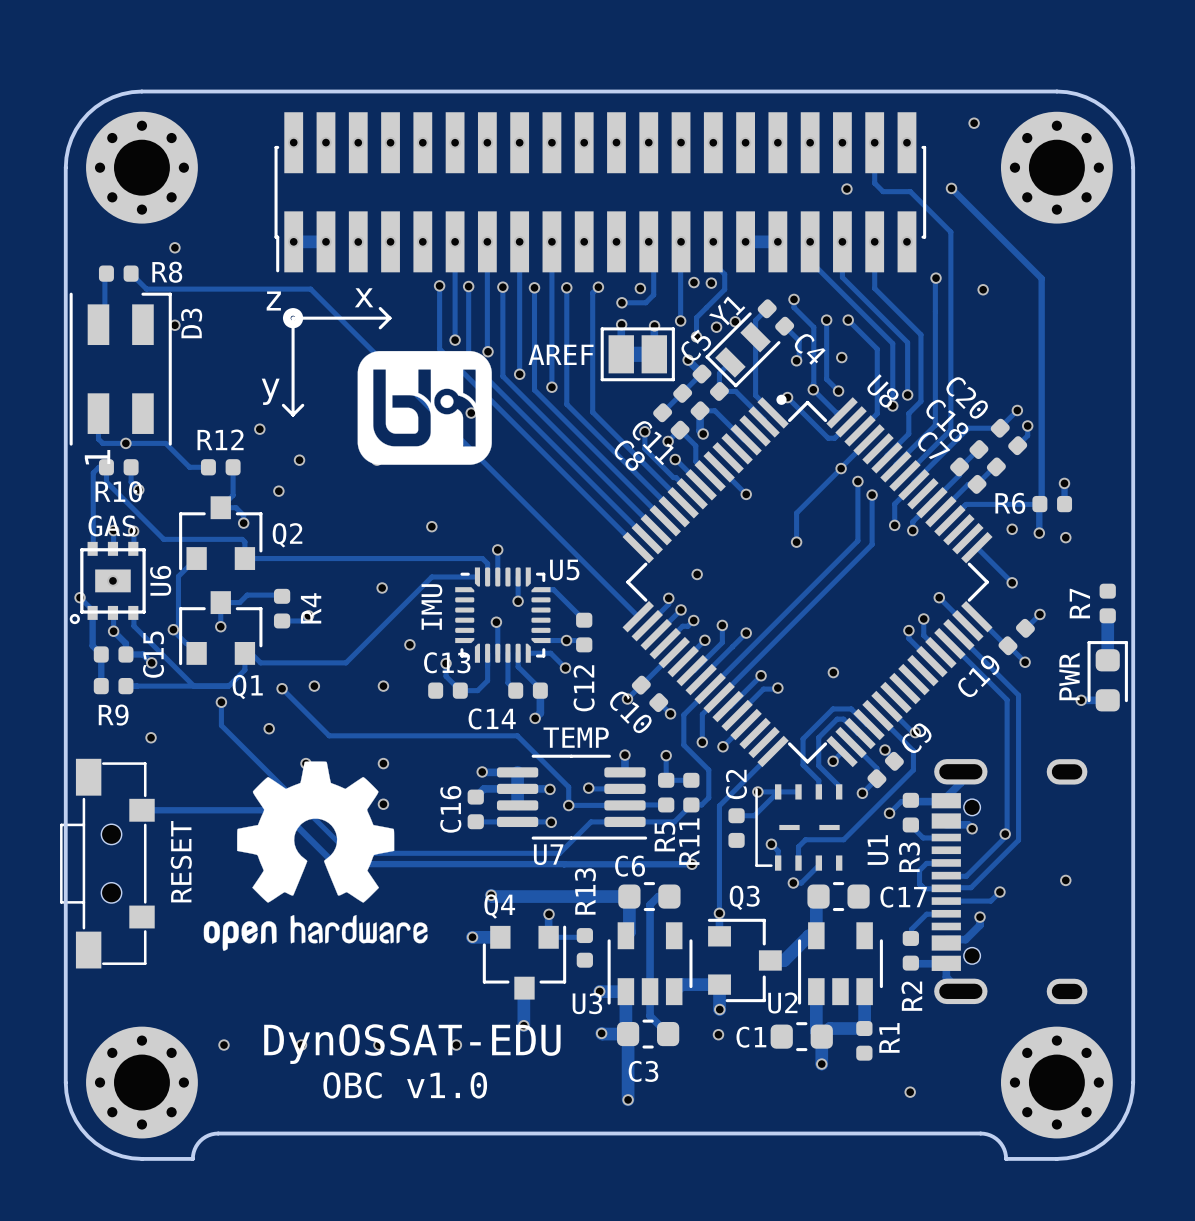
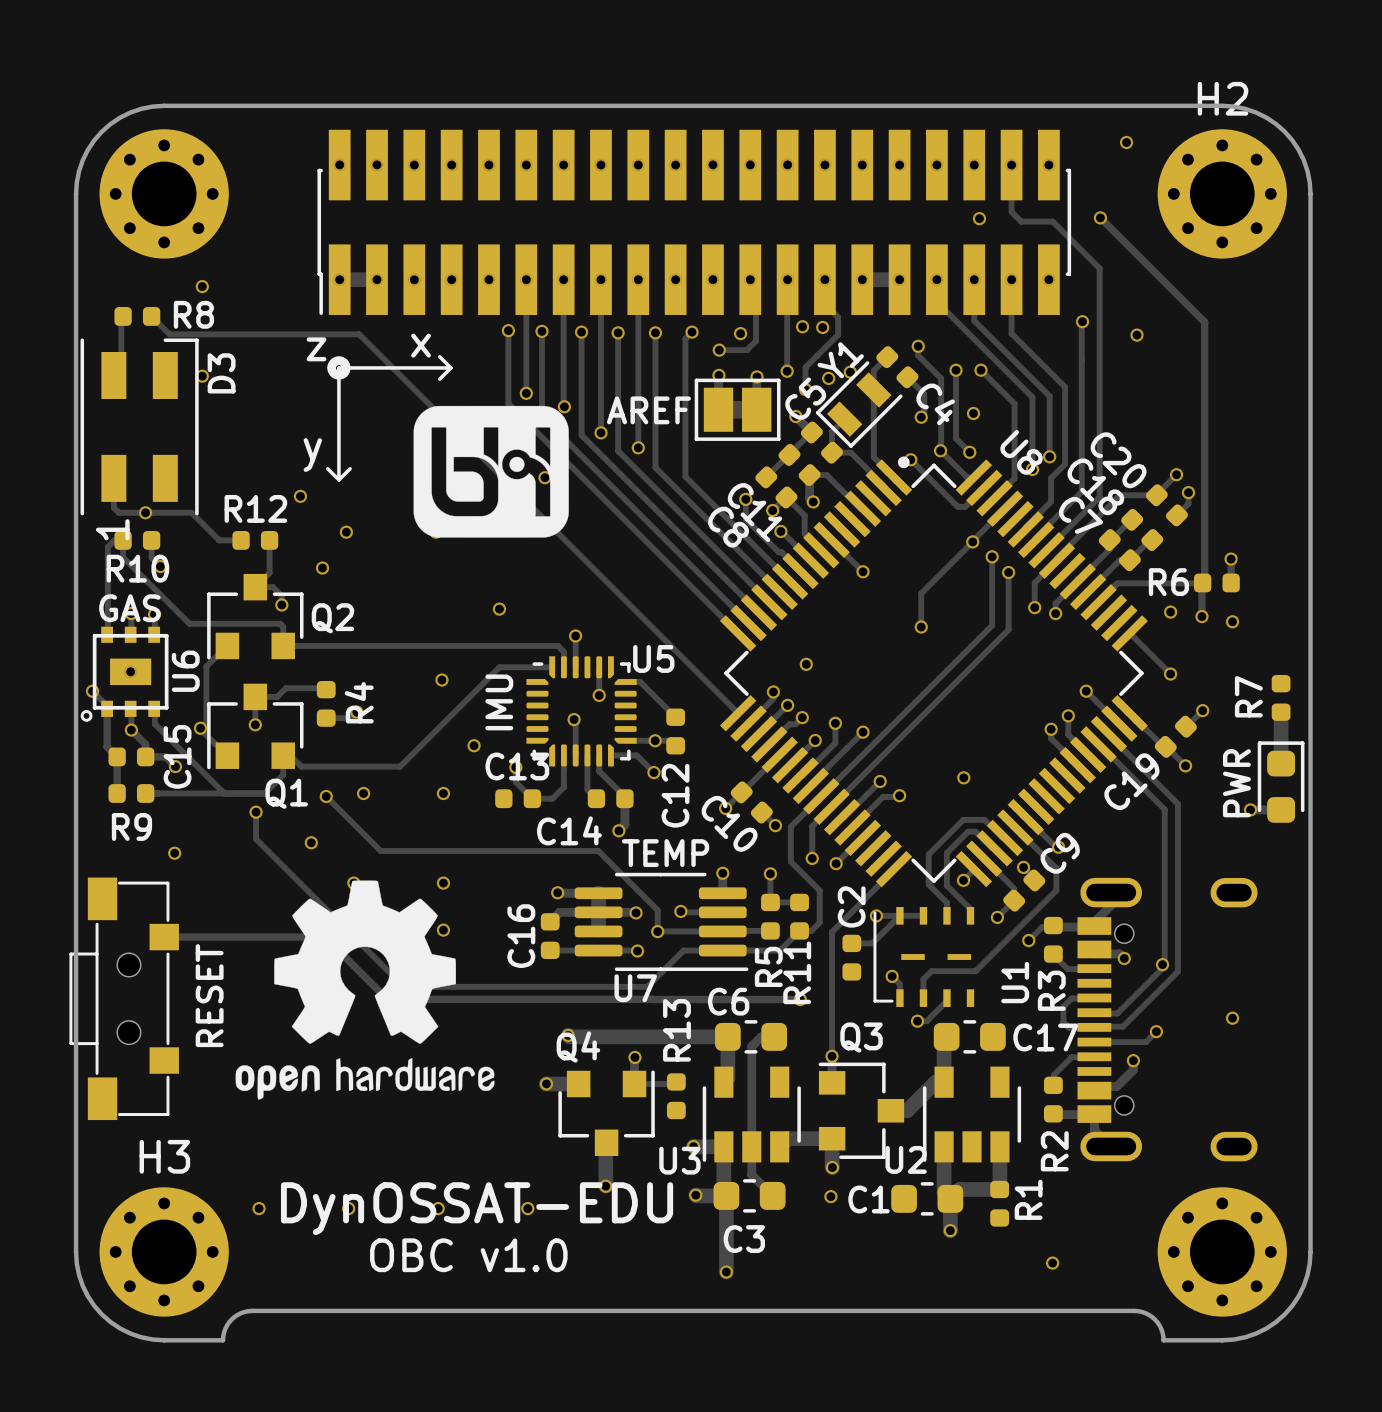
H2 name: none -> H2 (1223, 98)
H3 name: none -> H3 (164, 1156)

